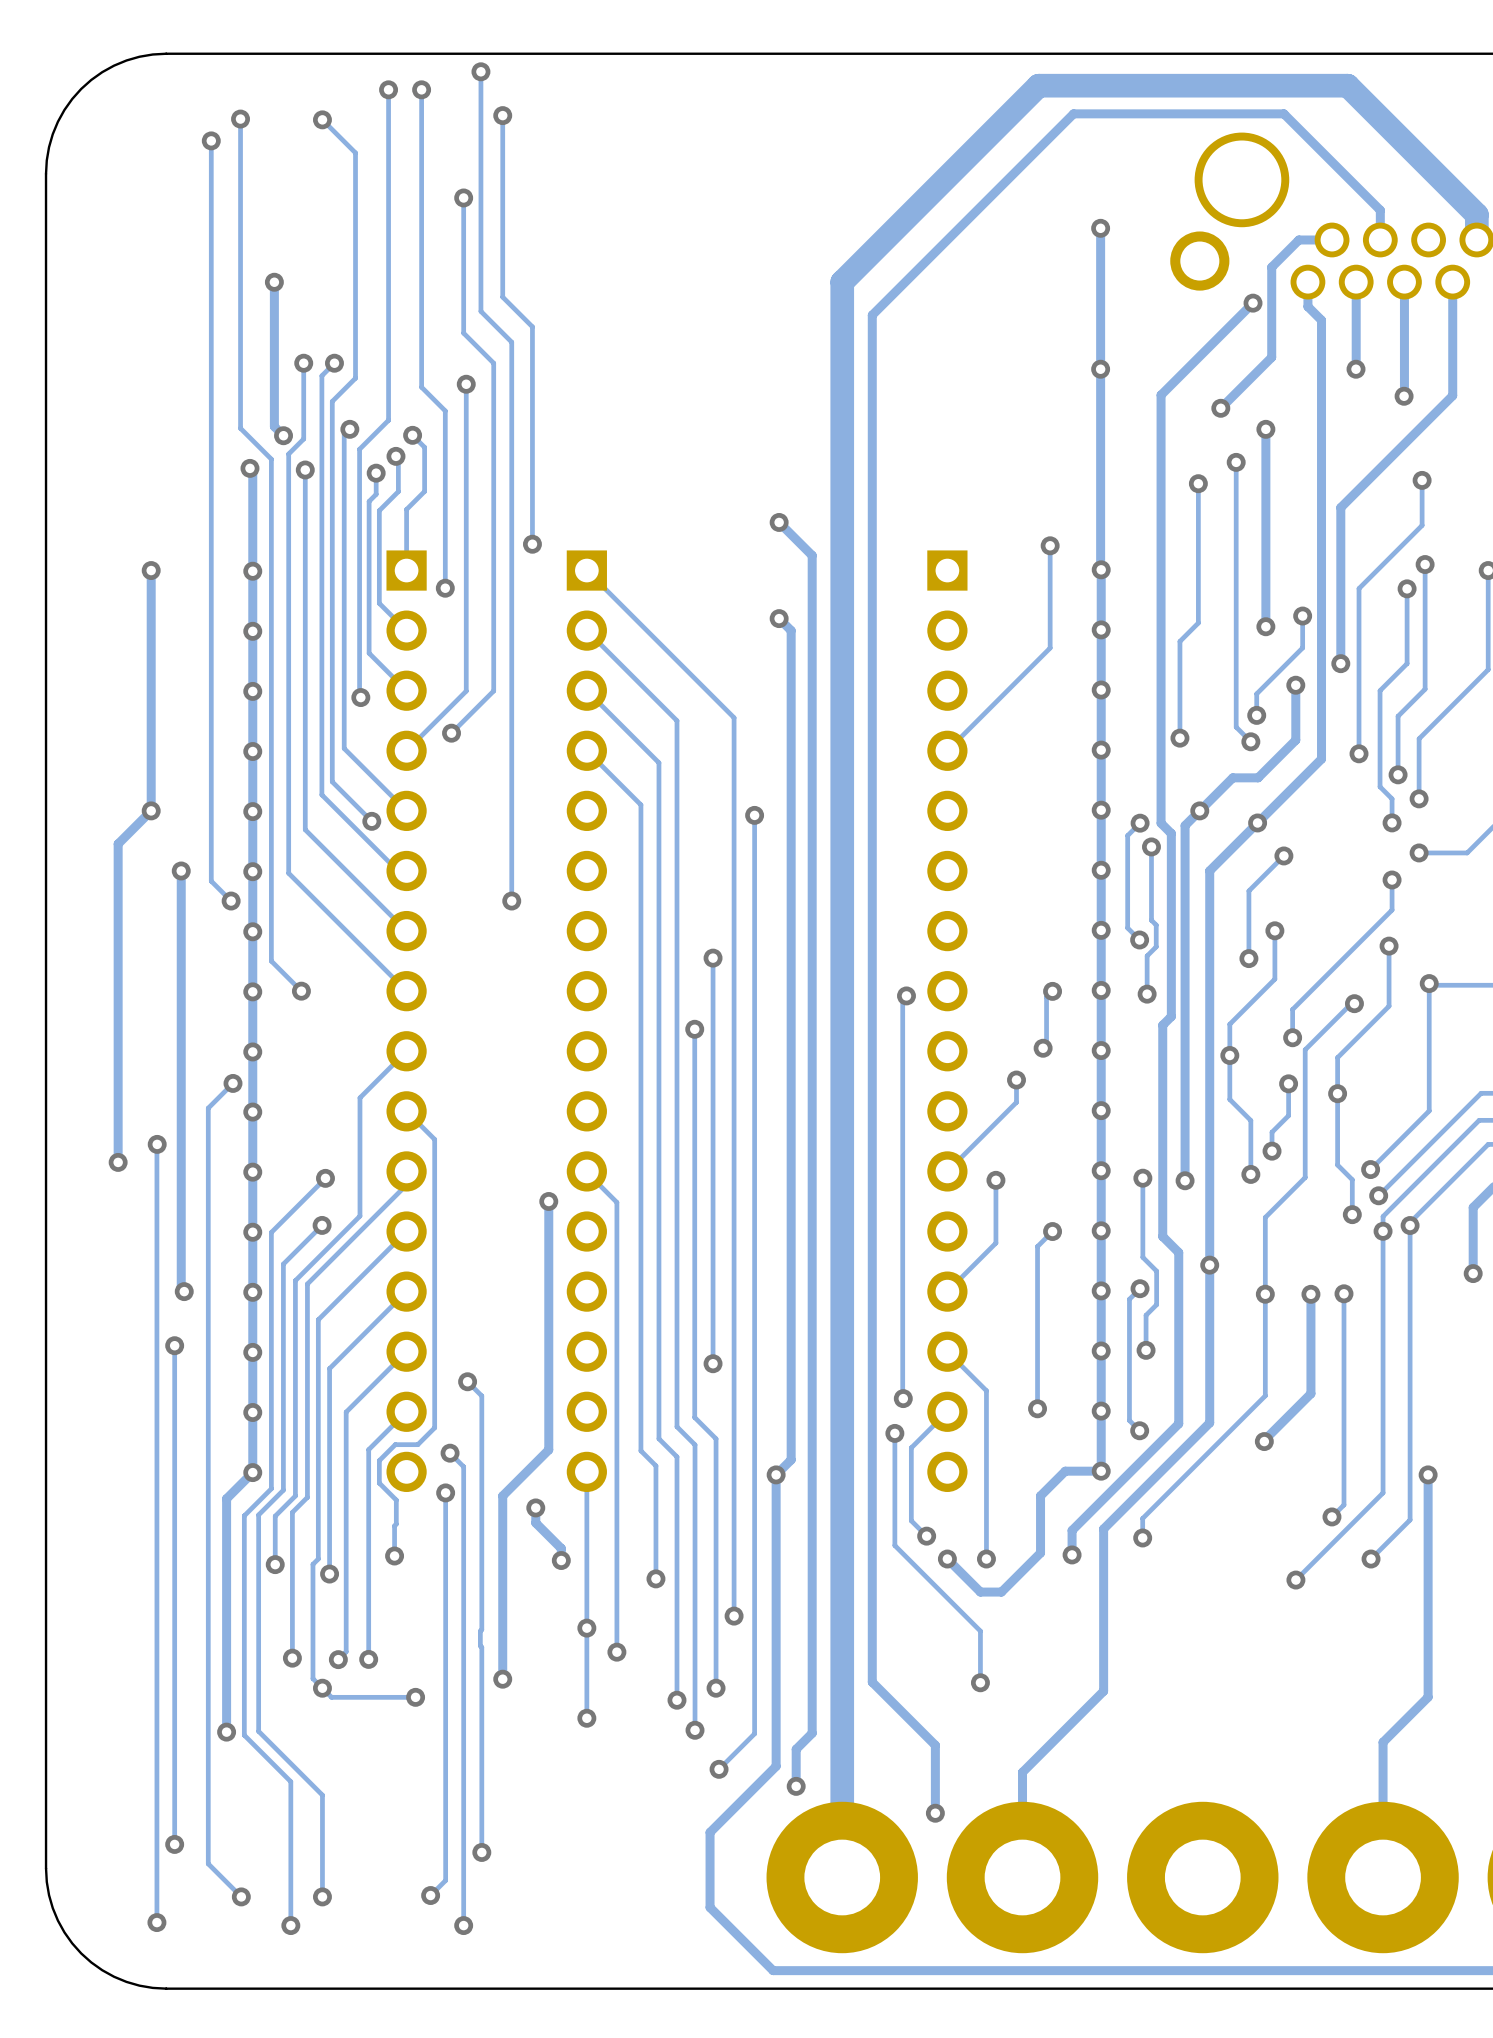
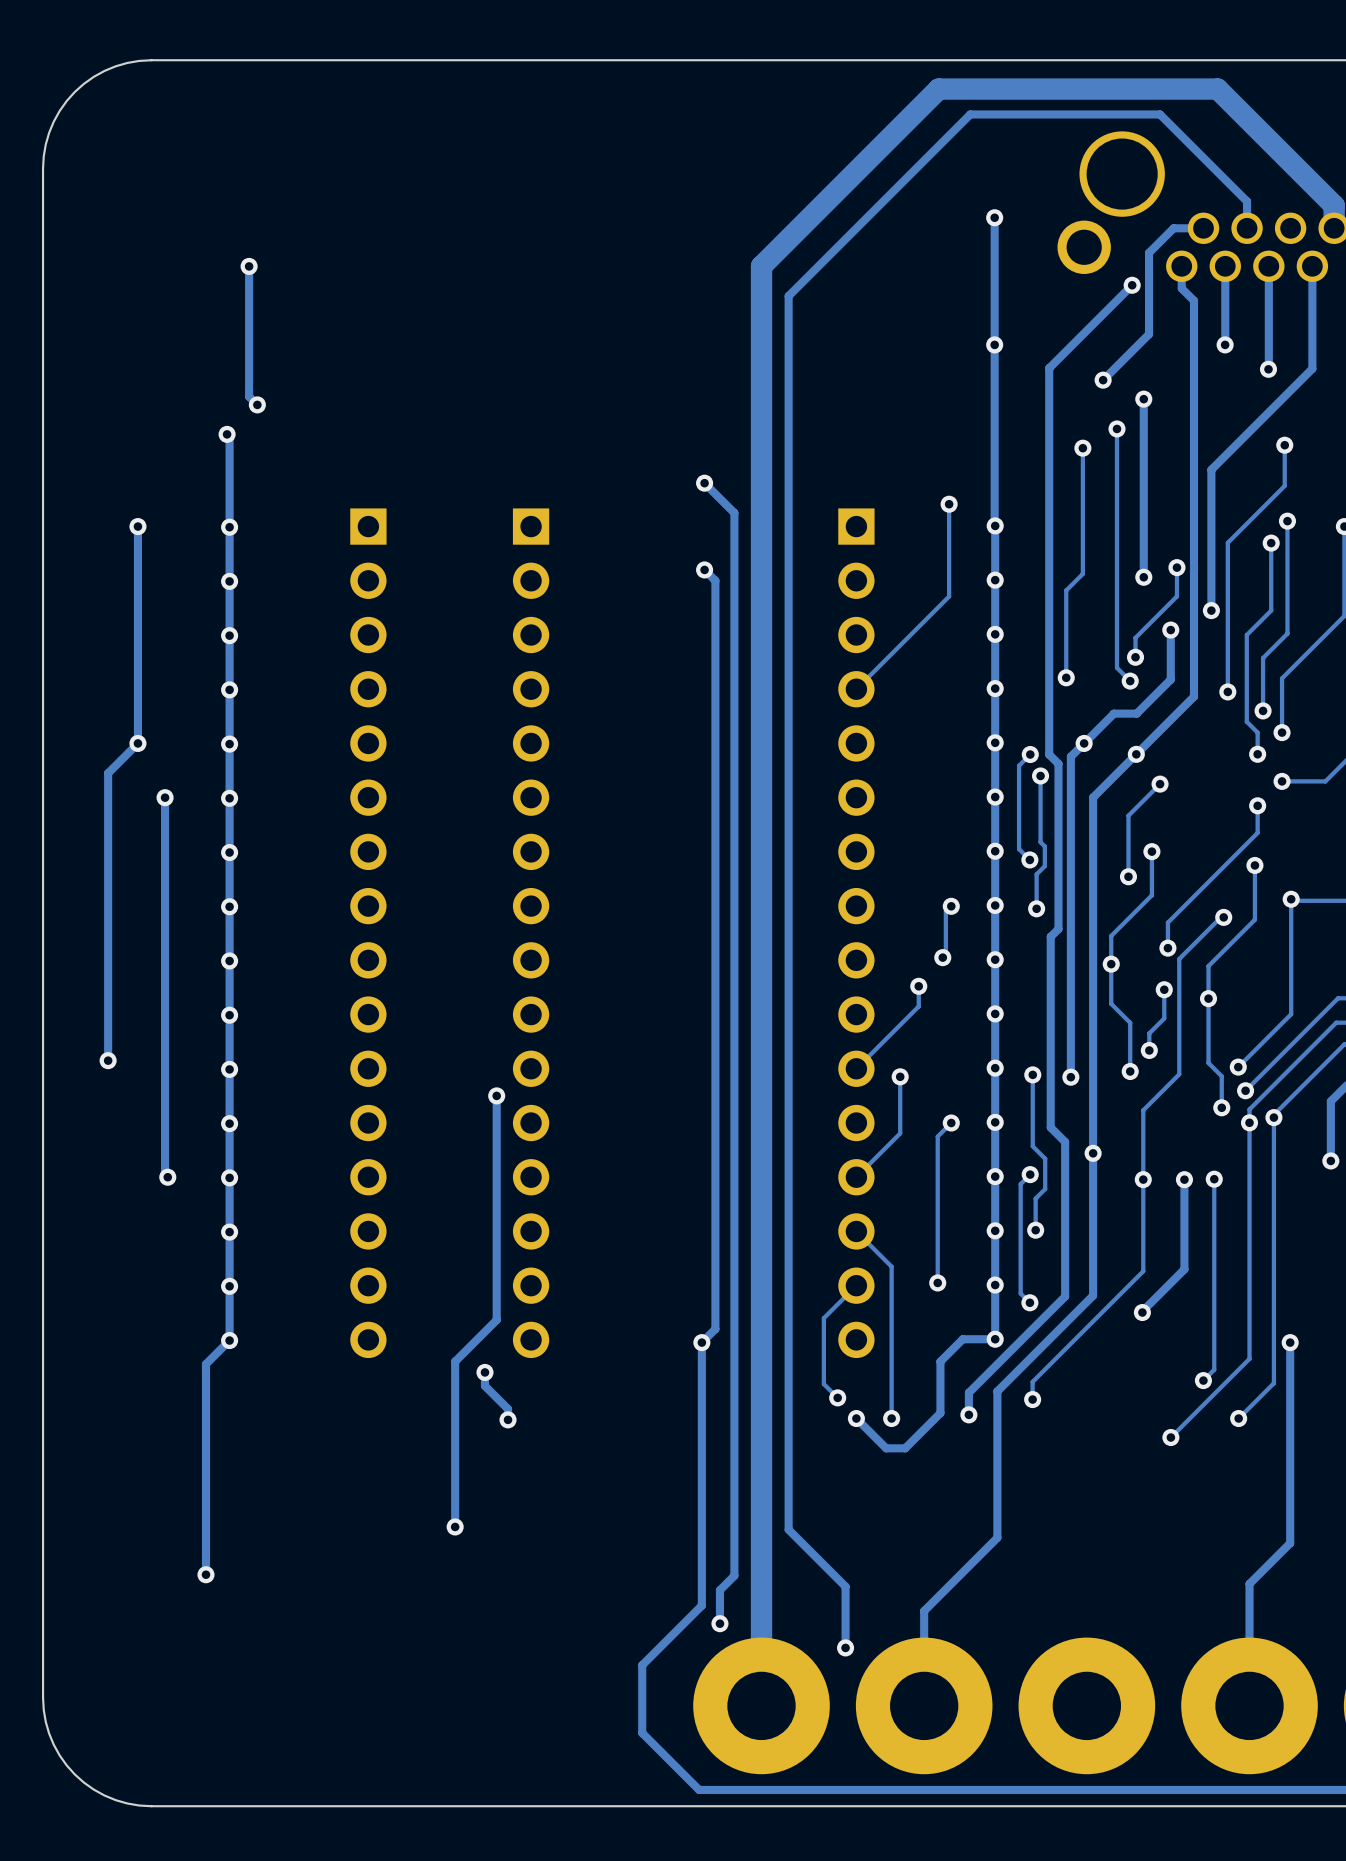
track: (480, 71) (480, 311) (511, 342) (511, 901) -> none
via: (480, 71) -> none
track: (388, 89) (388, 420) (359, 449) (360, 697) -> none
via: (388, 89) -> none
track: (421, 89) (421, 387) (445, 410) (445, 588) -> none
via: (421, 89) -> none
track: (502, 115) (502, 297) (532, 326) (532, 544) -> none
via: (502, 115) -> none
track: (240, 119) (240, 428) (271, 459) (271, 961) (301, 991) -> none
via: (240, 119) -> none
track: (322, 119) (355, 152) (355, 378) (332, 401) (332, 781) (371, 821) -> none
via: (322, 119) -> none
track: (211, 140) (211, 881) (231, 901) -> none
via: (211, 140) -> none
track: (463, 197) (463, 333) (493, 363) (493, 690) (451, 733) -> none
via: (463, 197) -> none
track: (303, 363) (303, 438) (288, 454) (288, 873) (406, 991) -> none
via: (303, 363) -> none
track: (334, 363) (321, 375) (321, 794) (397, 870) -> none
via: (334, 363) -> none
track: (466, 384) (466, 691) (406, 750) -> none
via: (466, 384) -> none
track: (349, 429) (344, 434) (344, 748) (406, 810) -> none
via: (349, 429) -> none
track: (412, 435) (424, 447) (424, 491) (406, 509) (406, 570) -> none
via: (412, 435) -> none
track: (395, 456) (398, 458) (398, 491) (379, 510) (379, 603) (406, 630) -> none
via: (395, 456) -> none
track: (305, 470) (305, 829) (406, 931) -> none
via: (305, 470) -> none
track: (376, 473) (376, 494) (369, 501) (369, 653) (406, 690) -> none
via: (376, 473) -> none
via: (532, 544) -> none
track: (586, 570) (734, 717) (734, 1616) -> none
via: (445, 588) -> none
track: (586, 630) (676, 720) (676, 1426) (695, 1444) (695, 1730) -> none
track: (586, 690) (658, 762) (658, 1438) (676, 1456) (676, 1700) -> none
via: (360, 697) -> none
via: (451, 733) -> none
track: (586, 750) (640, 804) (640, 1450) (655, 1465) (655, 1578) -> none
track: (754, 815) (754, 1733) (719, 1769) -> none
via: (754, 815) -> none
via: (371, 821) -> none
via: (231, 901) -> none
via: (511, 901) -> none
track: (713, 958) (713, 1363) -> none
via: (713, 958) -> none
via: (301, 991) -> none
track: (906, 995) (902, 999) (903, 1398) -> none
via: (906, 995) -> none
track: (694, 1029) (694, 1417) (716, 1438) (716, 1688) -> none
via: (694, 1029) -> none
track: (406, 1051) (359, 1097) (359, 1216) (295, 1280) (295, 1495) (275, 1516) (275, 1564) -> none
track: (233, 1083) (208, 1108) (208, 1863) (241, 1896) -> none
via: (233, 1083) -> none
track: (406, 1111) (434, 1139) (434, 1427) (417, 1444) (395, 1444) (379, 1460) (379, 1483) (396, 1500) (394, 1556) -> none
track: (156, 1144) (156, 1922) -> none
via: (157, 1144) -> none
track: (586, 1172) (616, 1202) (616, 1652) -> none
track: (325, 1178) (271, 1232) (271, 1488) (244, 1515) (244, 1735) (290, 1781) (290, 1925) -> none
via: (325, 1178) -> none
track: (406, 1184) (307, 1284) (307, 1497) (292, 1512) (292, 1658) -> none
track: (322, 1225) (283, 1264) (283, 1490) (258, 1514) (258, 1731) (322, 1795) (322, 1896) -> none
via: (322, 1225) -> none
track: (406, 1231) (318, 1319) (318, 1558) (312, 1564) (312, 1678) (331, 1697) (415, 1697) -> none
track: (406, 1291) (329, 1368) (329, 1574) -> none
track: (174, 1345) (174, 1844) -> none
via: (174, 1345) -> none
track: (406, 1351) (346, 1412) (346, 1651) (338, 1659) -> none
via: (713, 1363) -> none
track: (467, 1381) (481, 1395) (481, 1852) -> none
via: (467, 1381) -> none
via: (903, 1398) -> none
track: (406, 1411) (368, 1449) (368, 1659) -> none
track: (894, 1433) (894, 1545) (980, 1631) (980, 1682) -> none
via: (894, 1433) -> none
track: (450, 1453) (463, 1466) (463, 1925) -> none
via: (450, 1453) -> none
track: (586, 1471) (586, 1718) -> none
track: (445, 1492) (445, 1880) (430, 1895) -> none
via: (445, 1492) -> none
via: (394, 1556) -> none
via: (275, 1564) -> none
via: (329, 1574) -> none
via: (655, 1578) -> none
via: (734, 1616) -> none
via: (586, 1628) -> none
via: (616, 1652) -> none
via: (292, 1658) -> none
via: (338, 1659) -> none
via: (368, 1659) -> none
via: (980, 1682) -> none
via: (322, 1688) -> none
via: (716, 1688) -> none
via: (415, 1697) -> none
via: (676, 1700) -> none
via: (586, 1718) -> none
via: (695, 1730) -> none
via: (719, 1769) -> none
via: (174, 1844) -> none
via: (481, 1852) -> none
via: (430, 1895) -> none
via: (241, 1896) -> none
via: (322, 1896) -> none
via: (156, 1922) -> none
via: (290, 1925) -> none
via: (463, 1925) -> none

